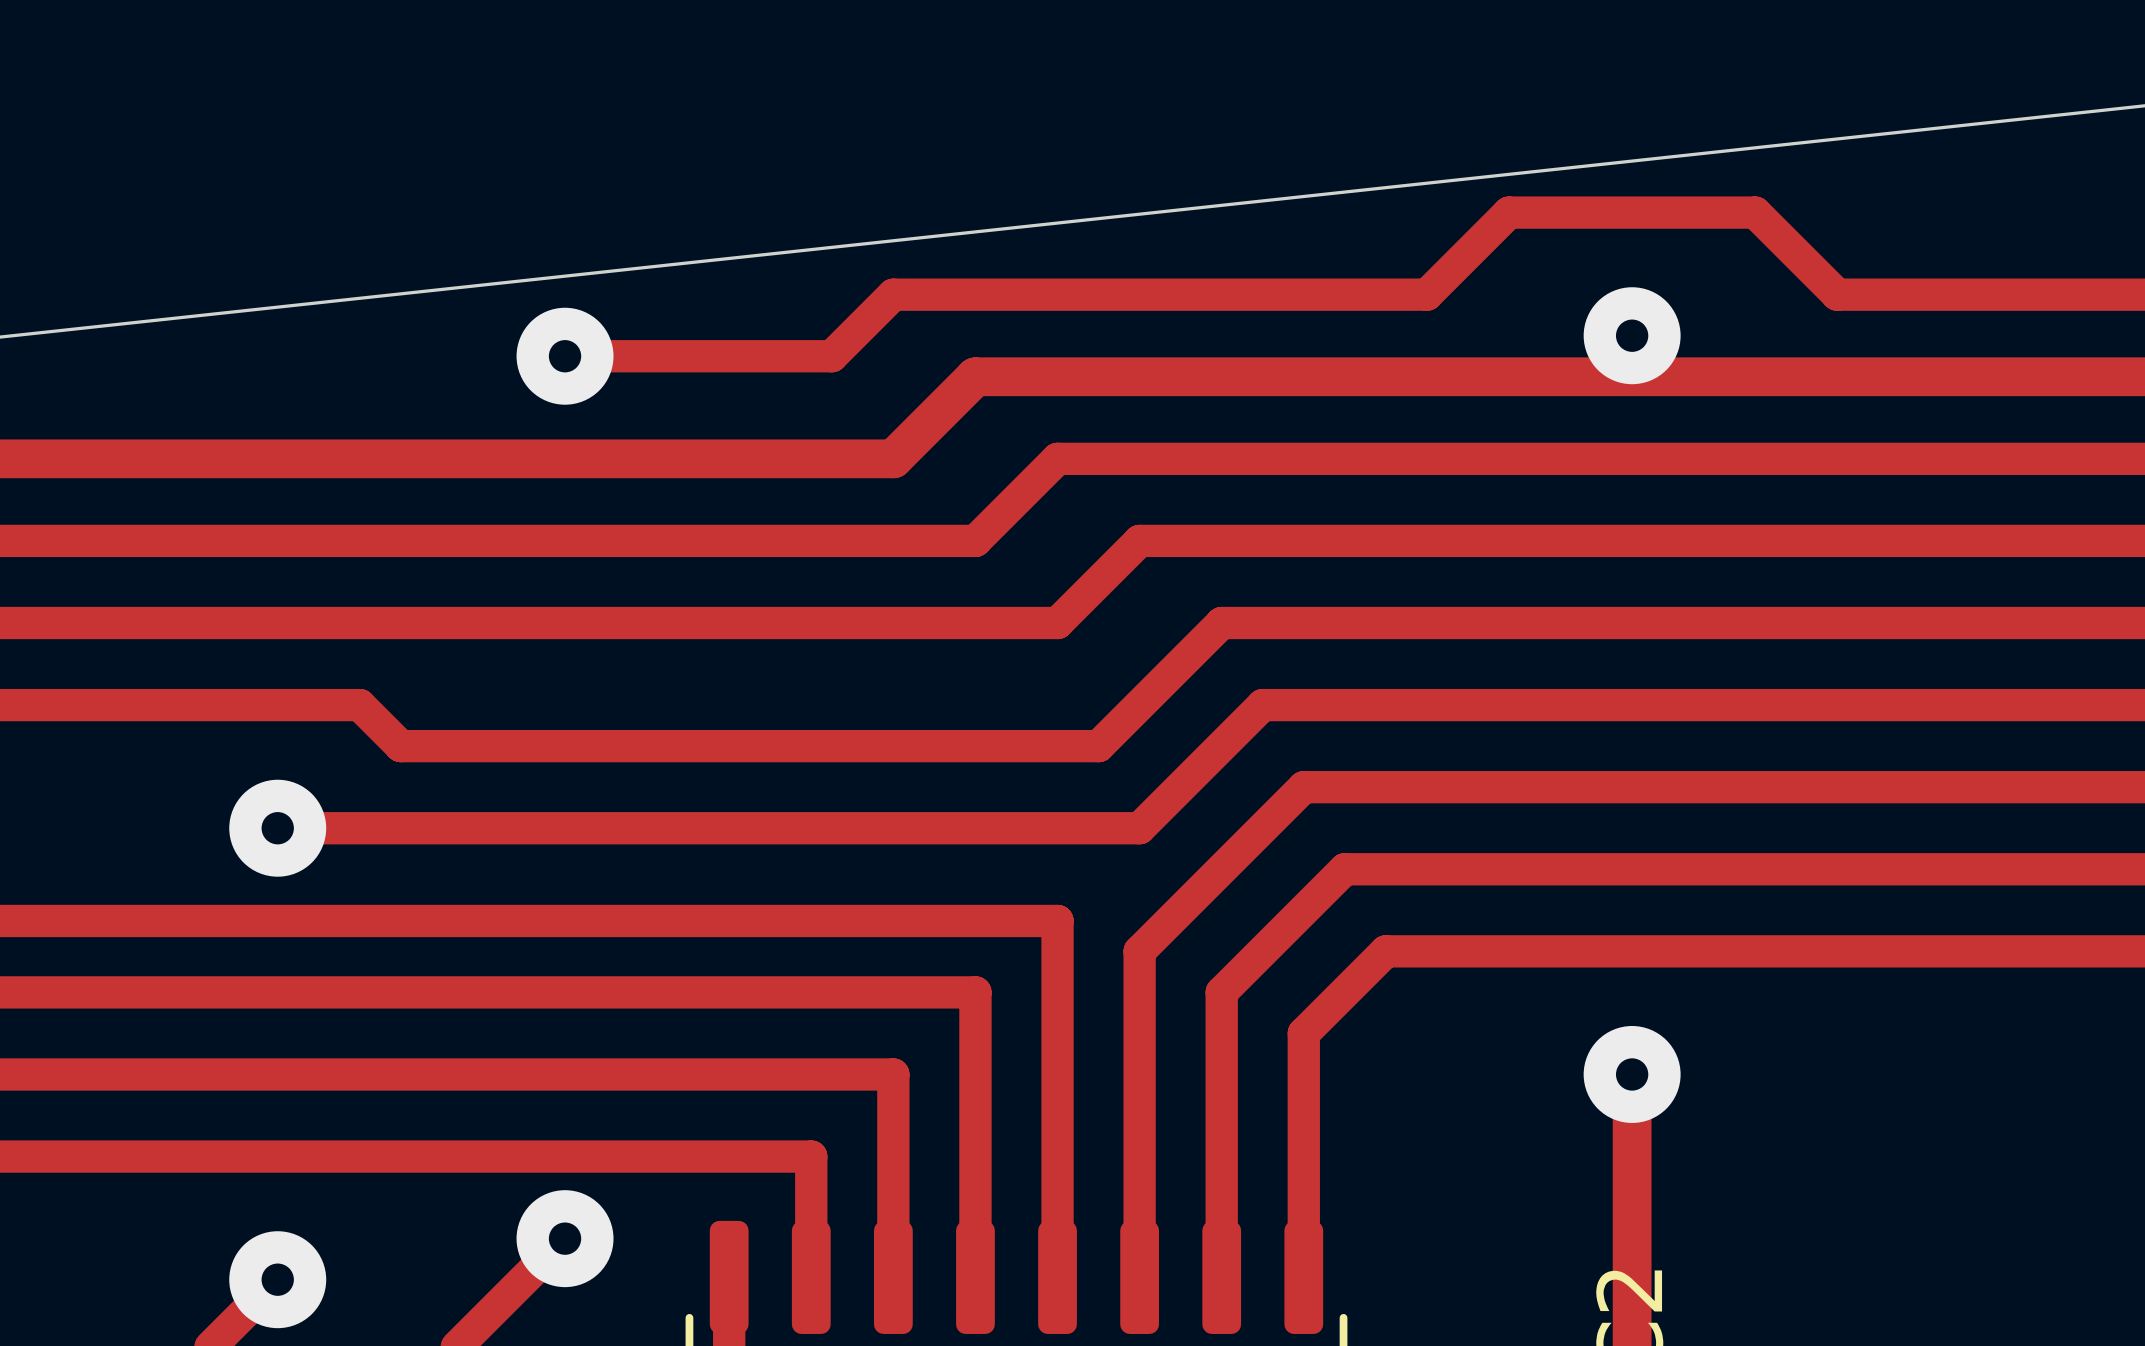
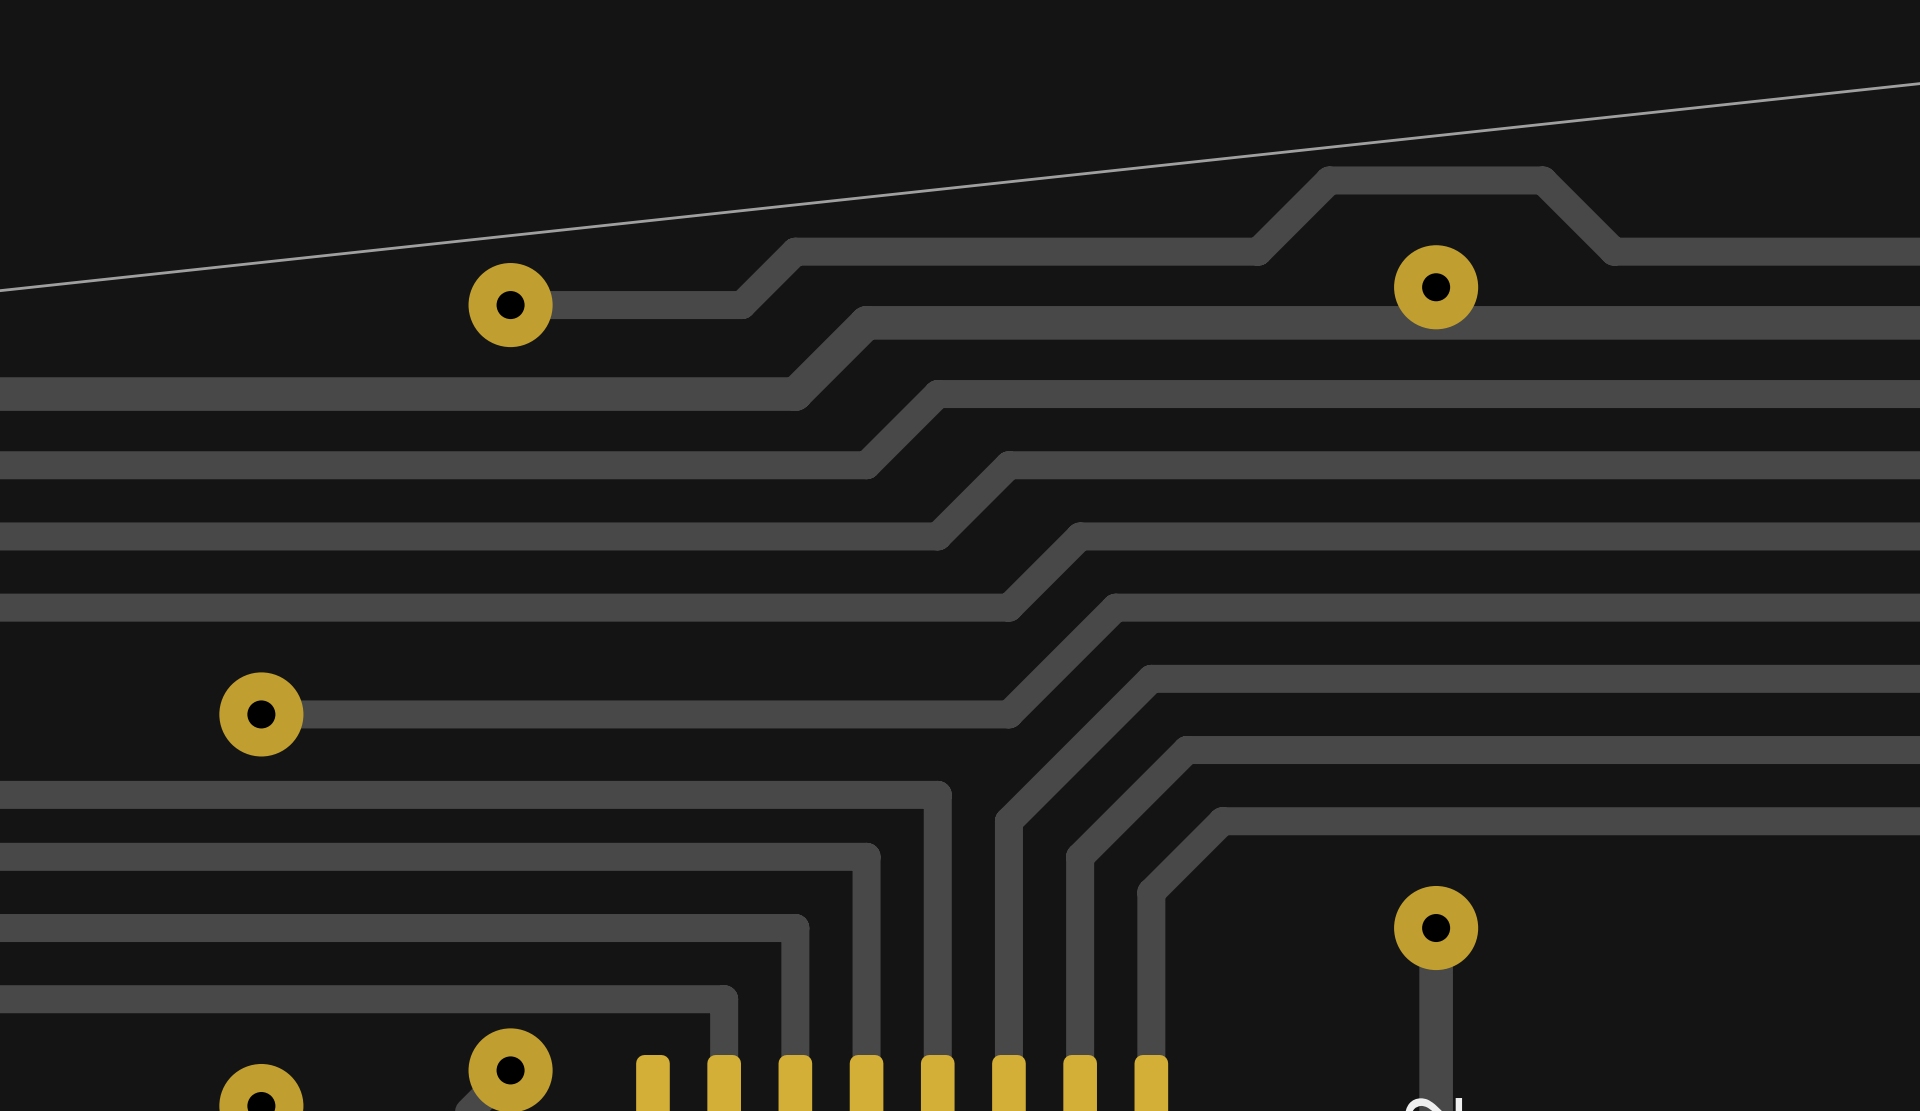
track: (359, 705) (400, 746) (1098, 746) (1139, 705) -> (332, 607) (1008, 607)

